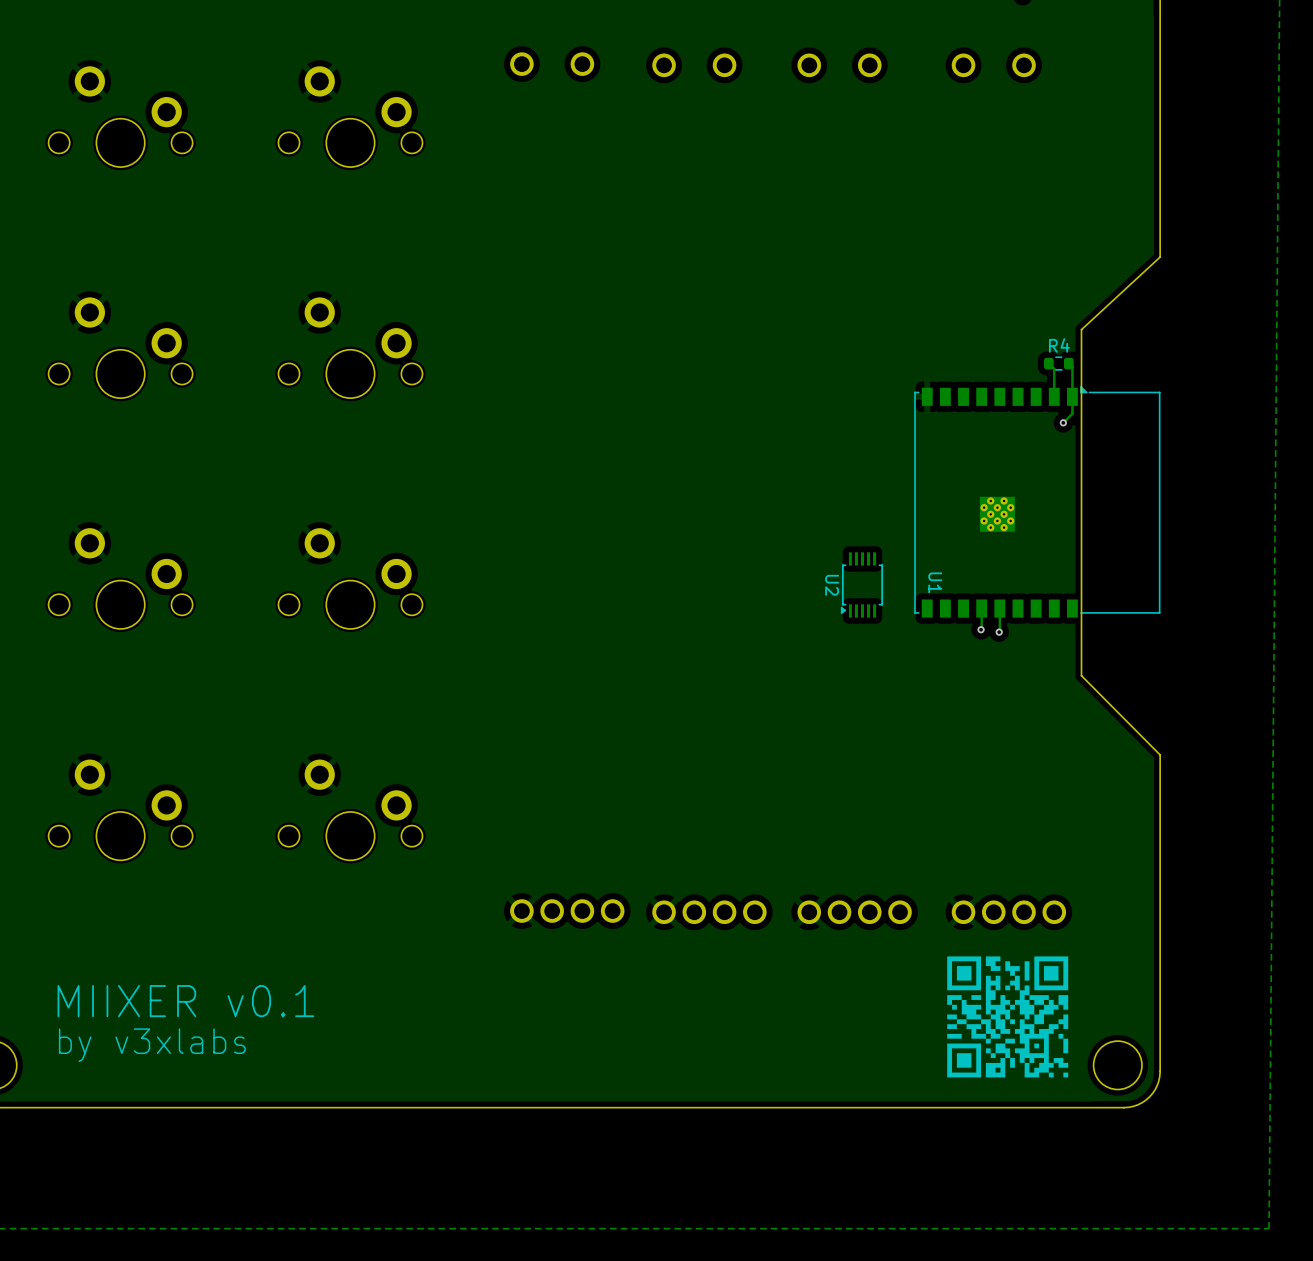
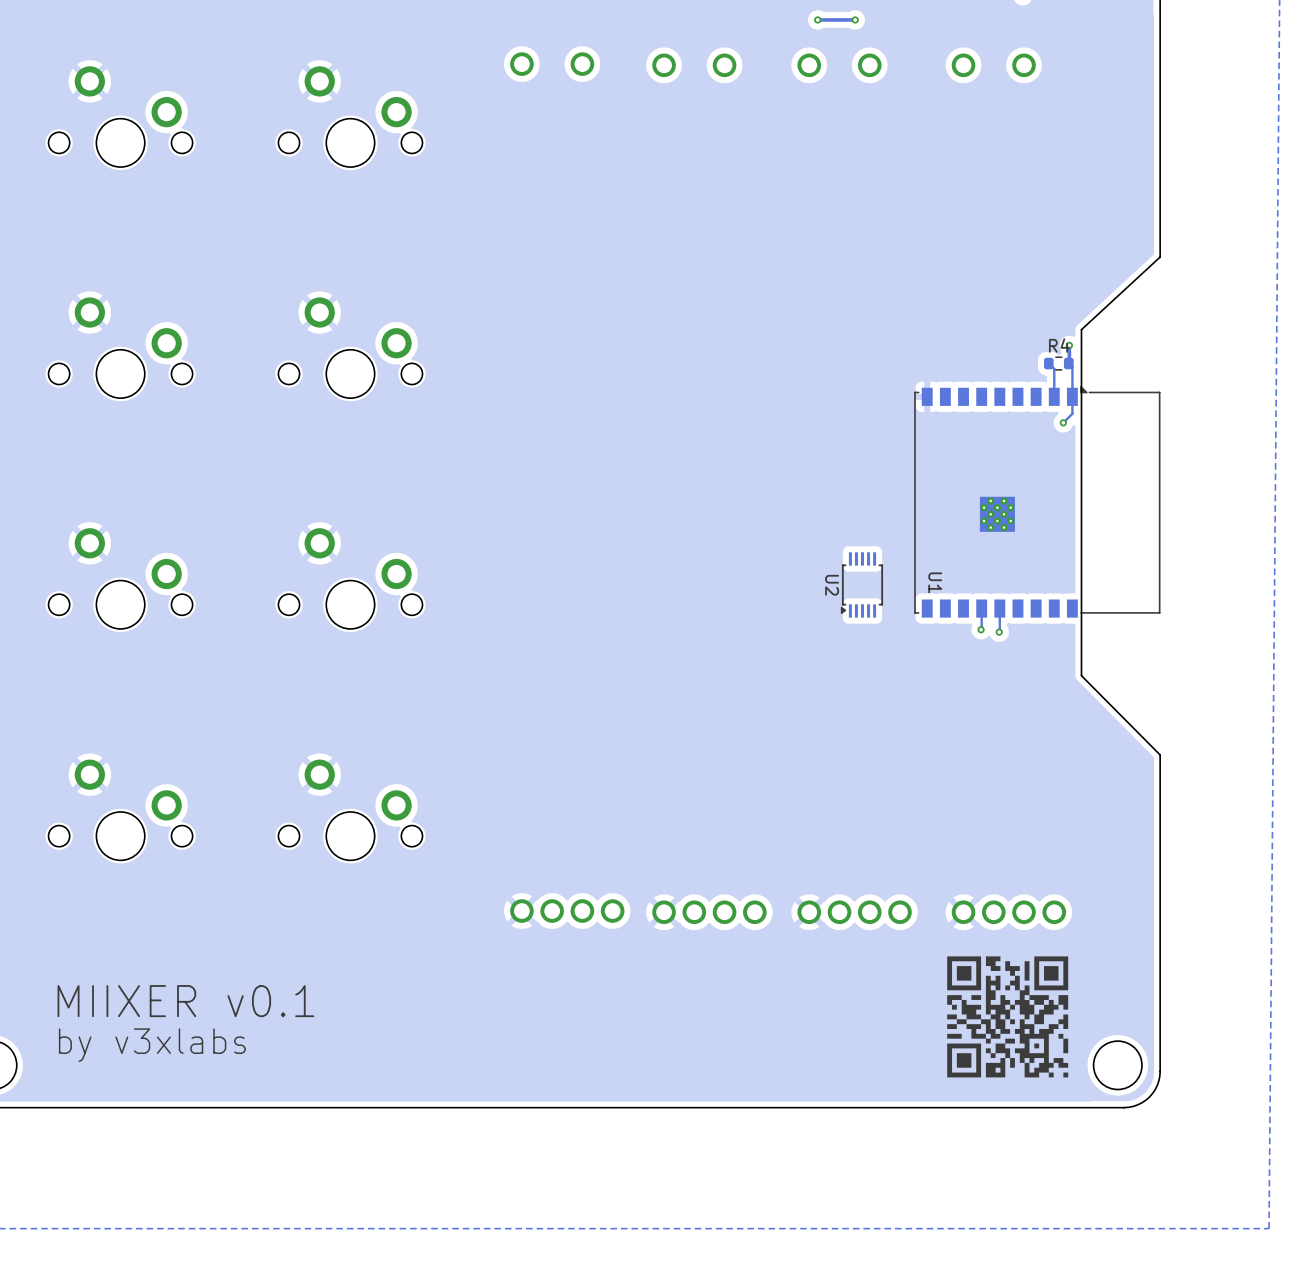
via: none -> (817, 19)
track: none -> (855, 19) (817, 19)
via: none -> (855, 19)
track: none -> (1069, 345) (1068, 363)
via: none -> (1069, 345)

